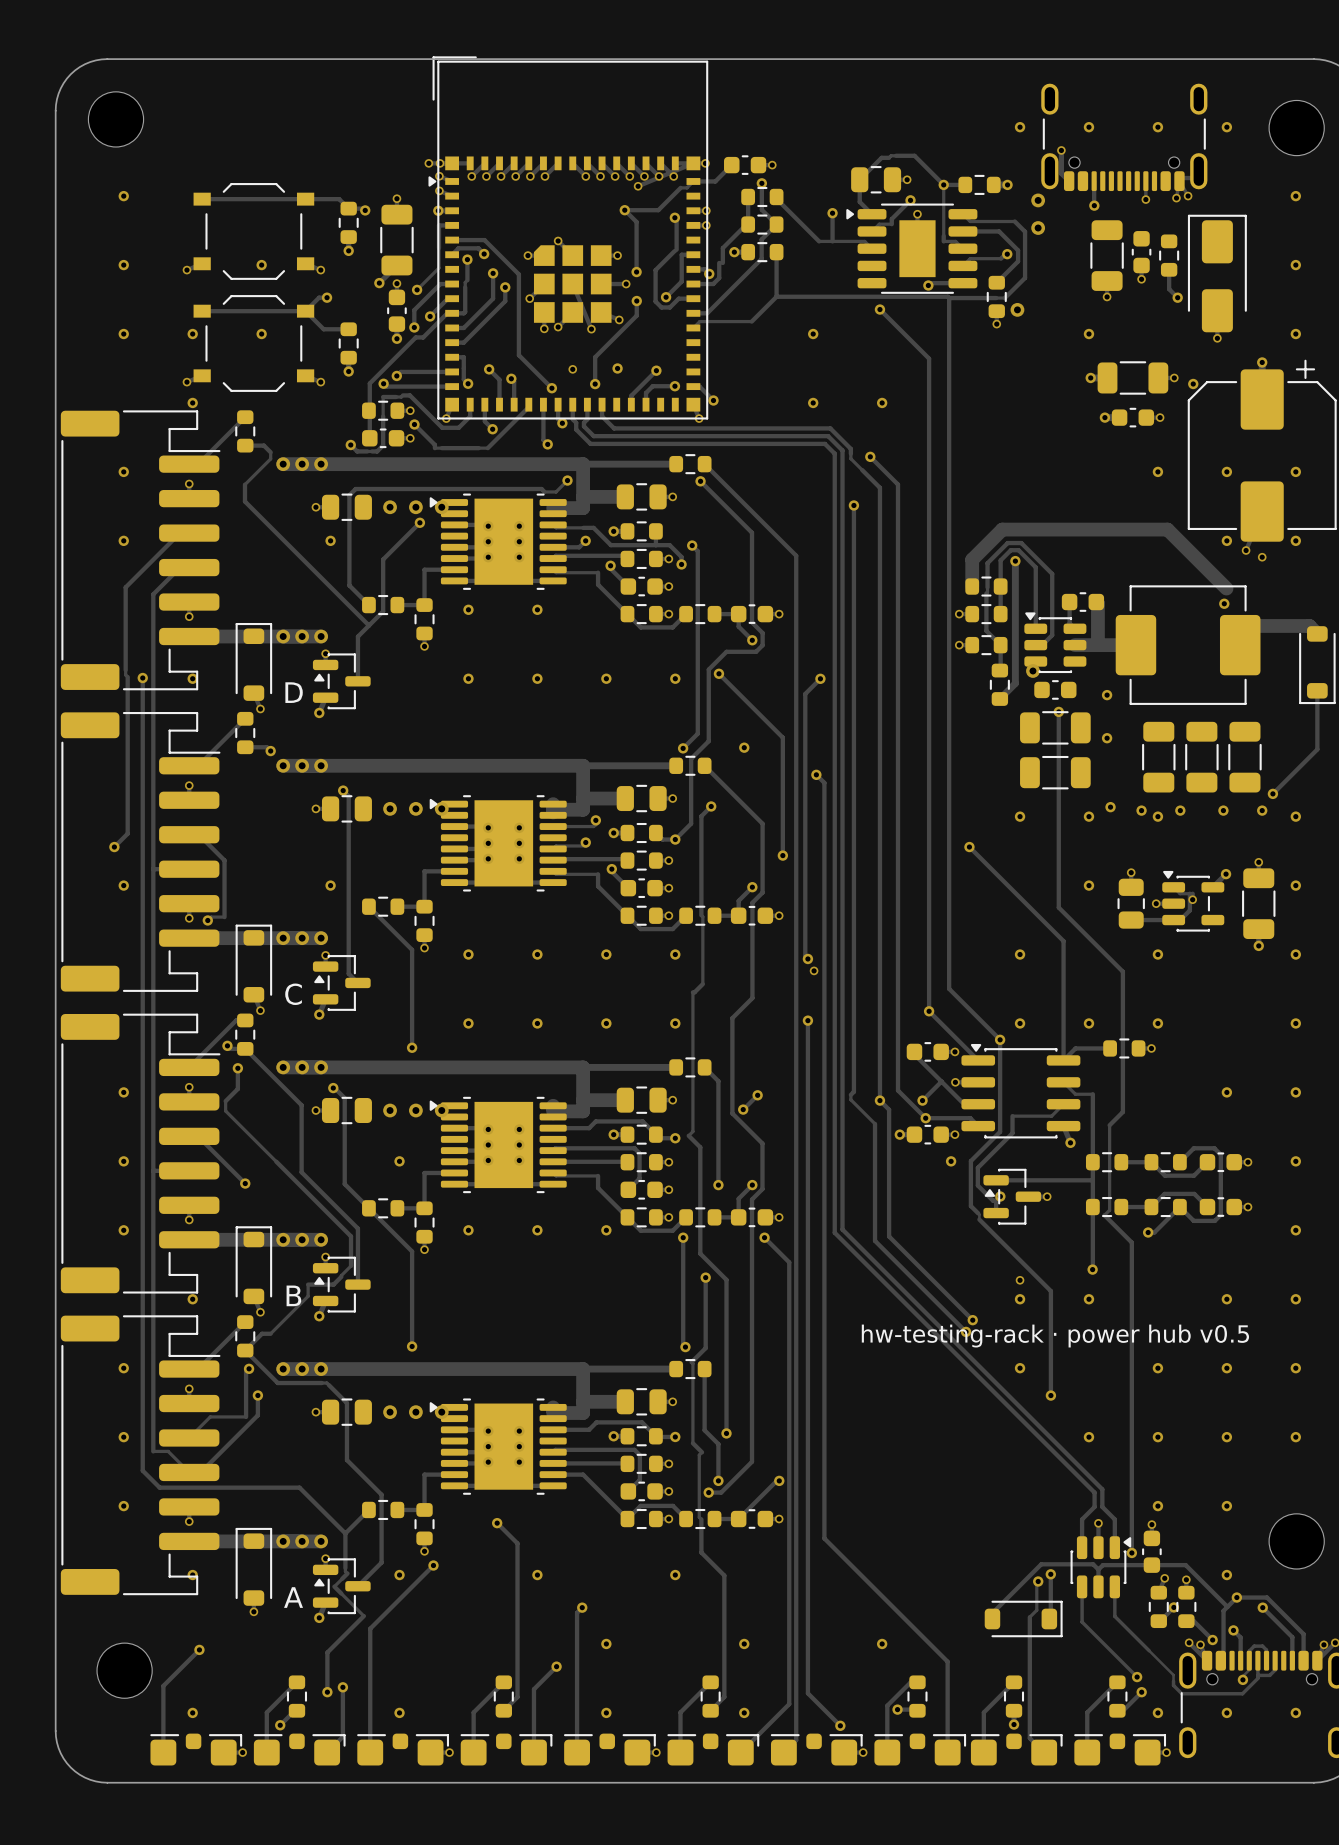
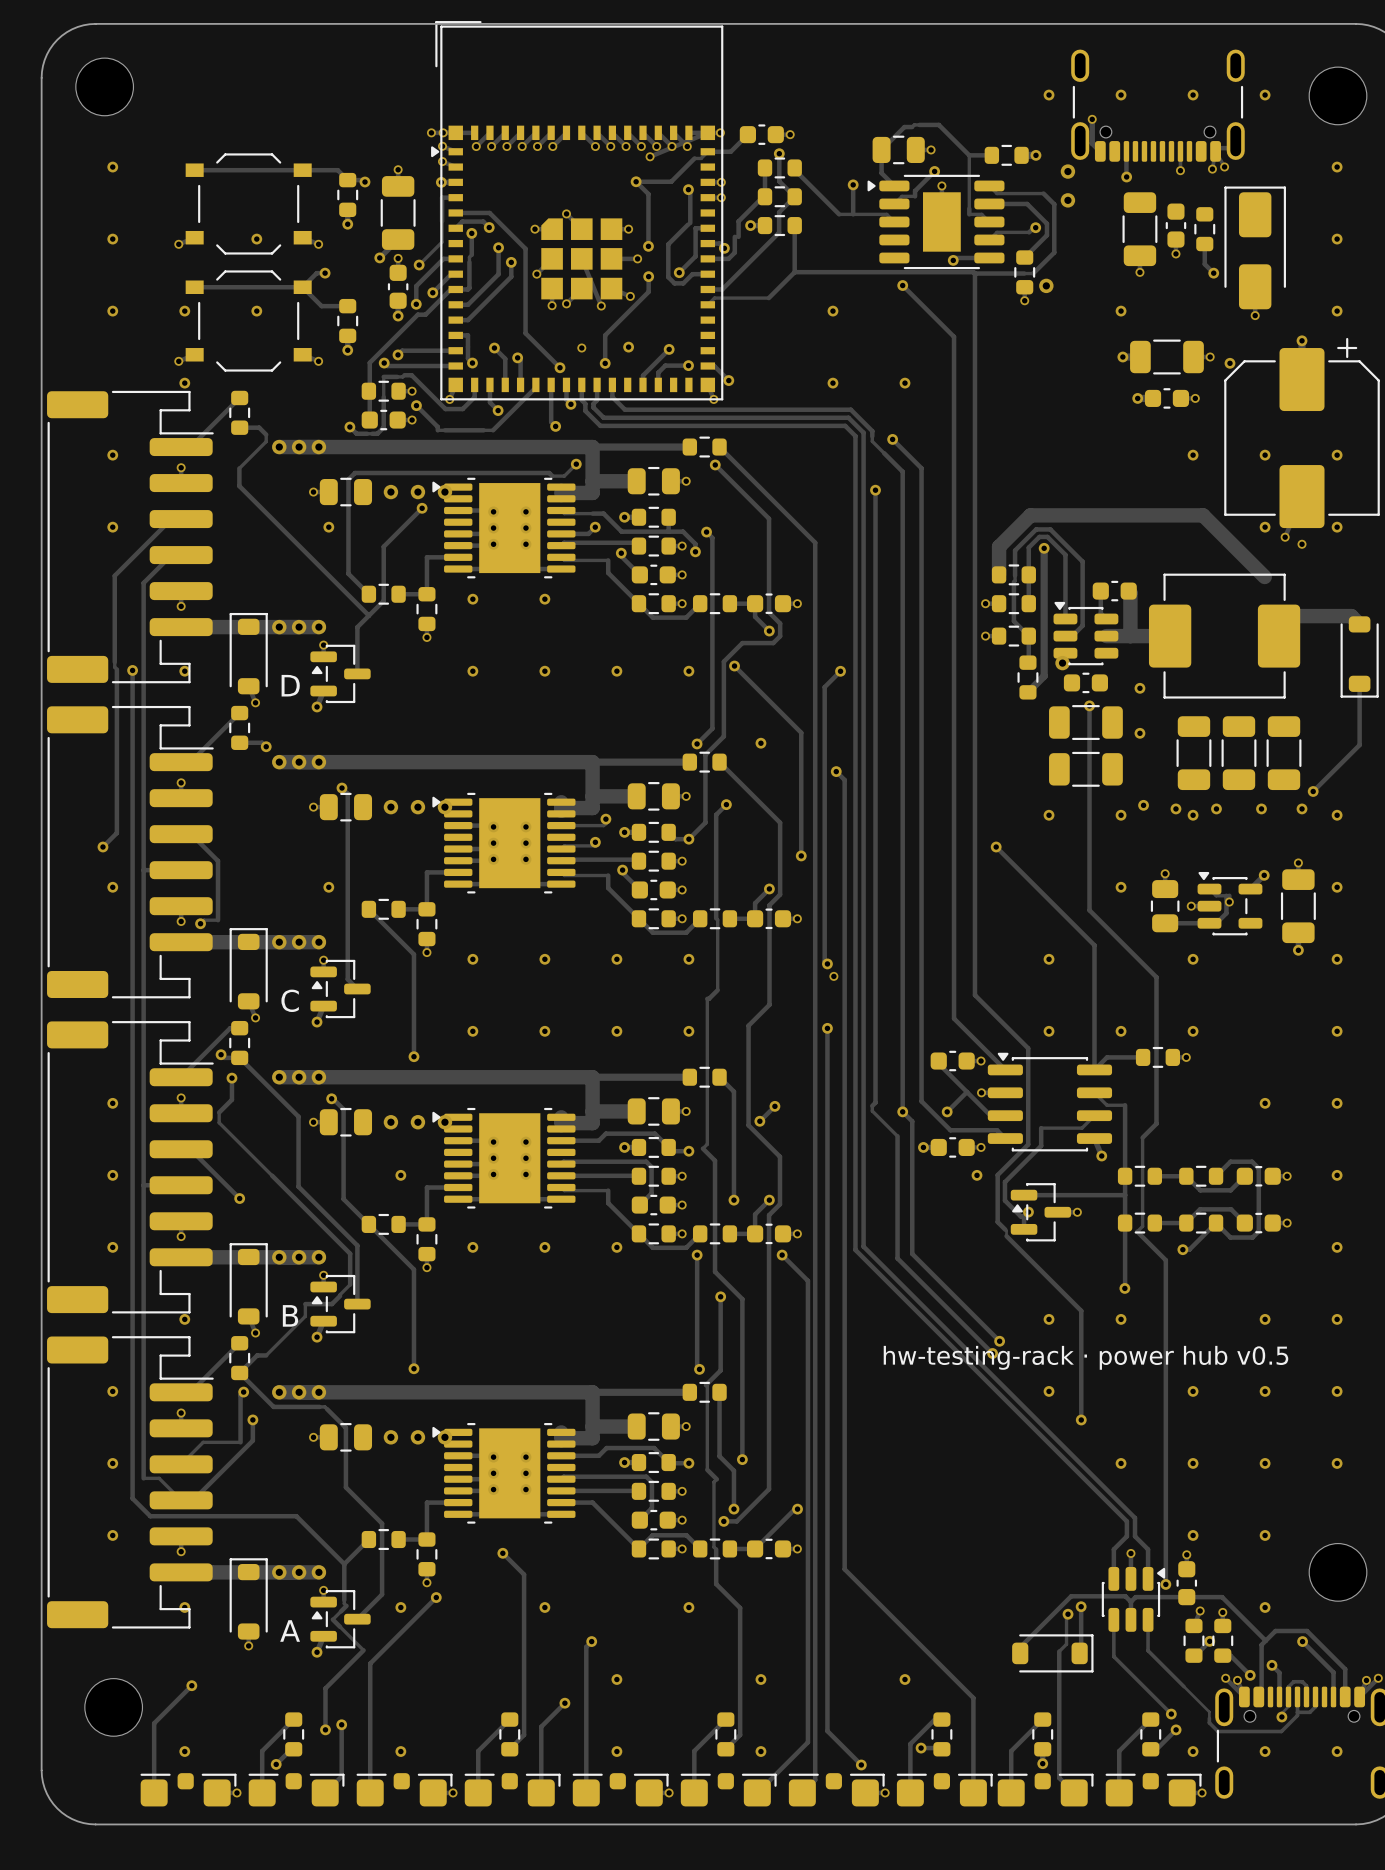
via: (943, 184) -> none
via: (1224, 603) -> none
via: (929, 1011) -> none
via: (1000, 1039) -> none
via: (925, 1118) -> none
via: (1020, 1280) -> none
via: (1236, 1597) -> none

